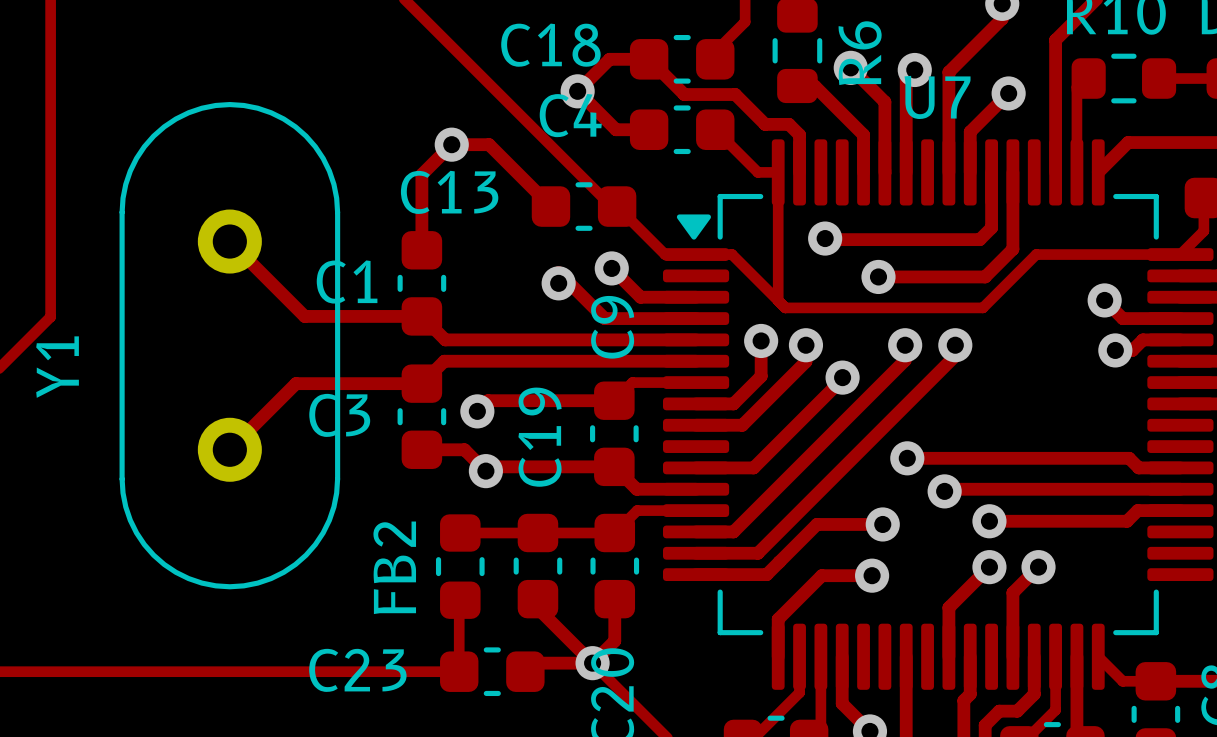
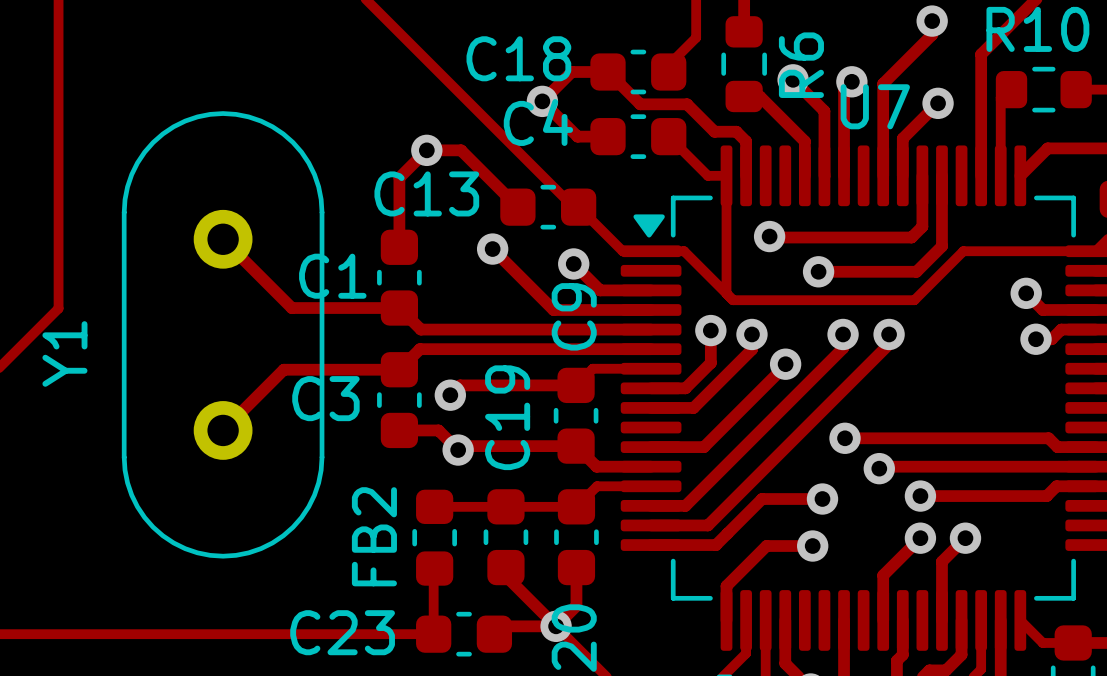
track: (558, 272) (604, 318) -> (492, 249) (553, 309) (567, 309)
via position: (558, 283) -> (492, 249)

